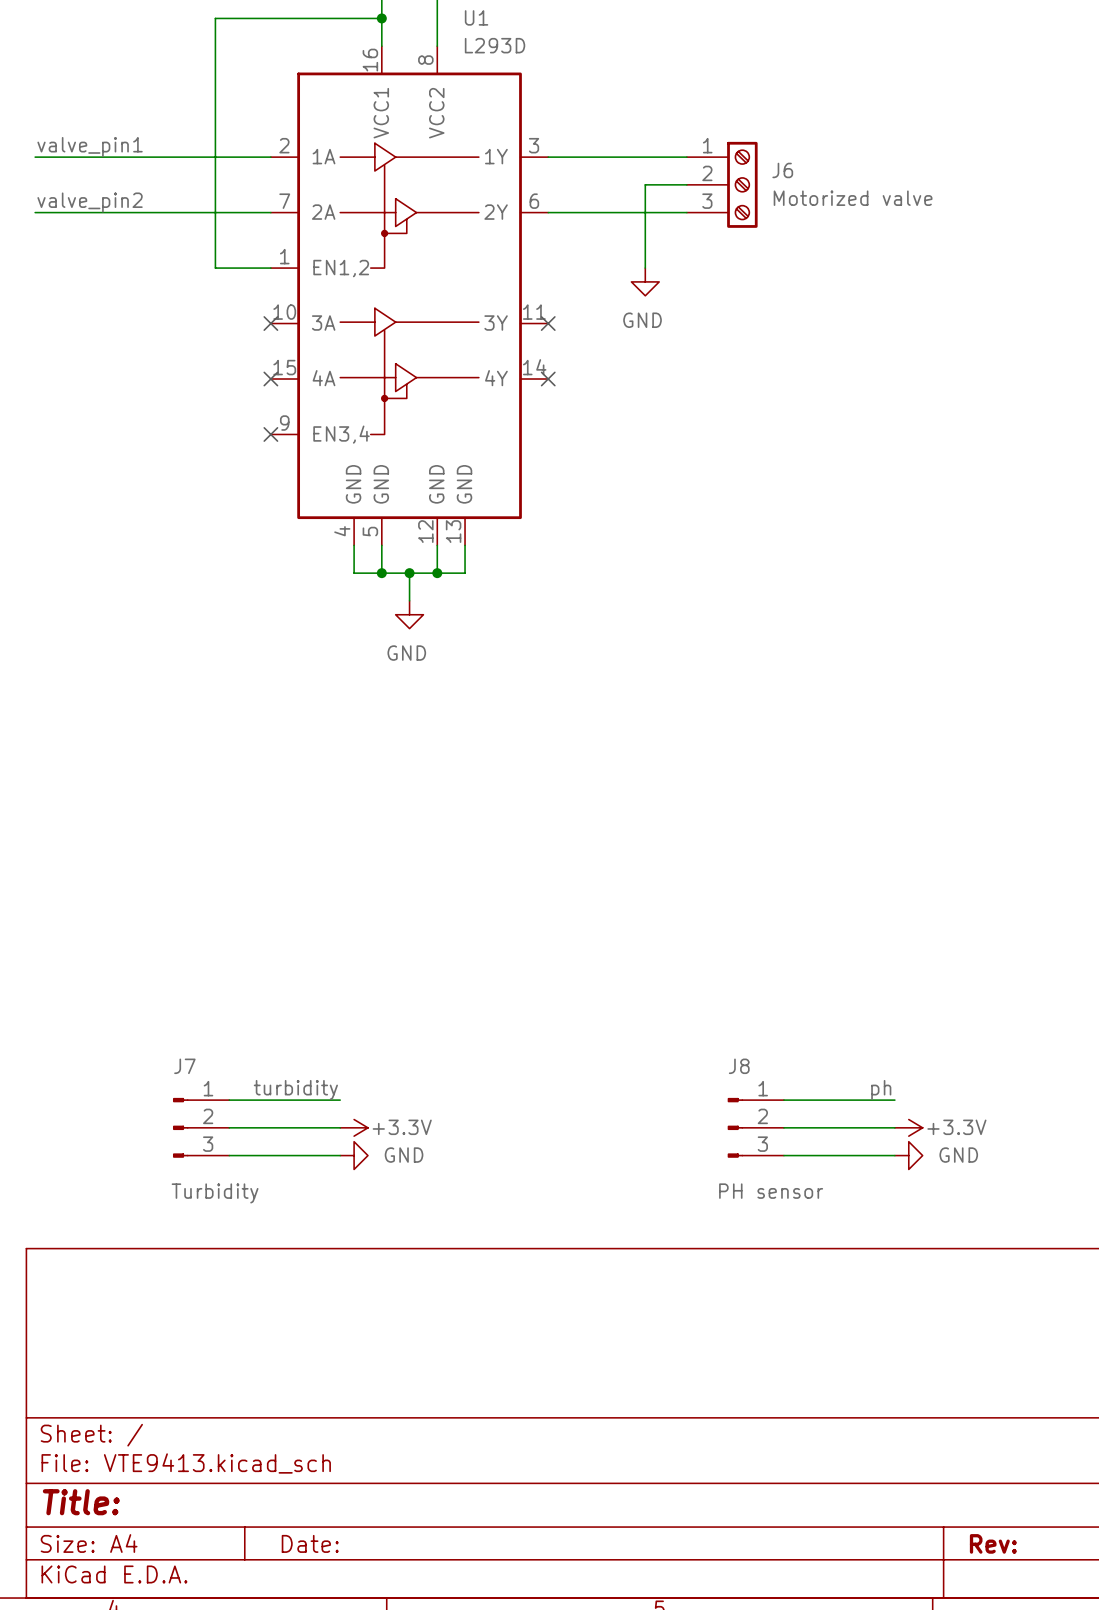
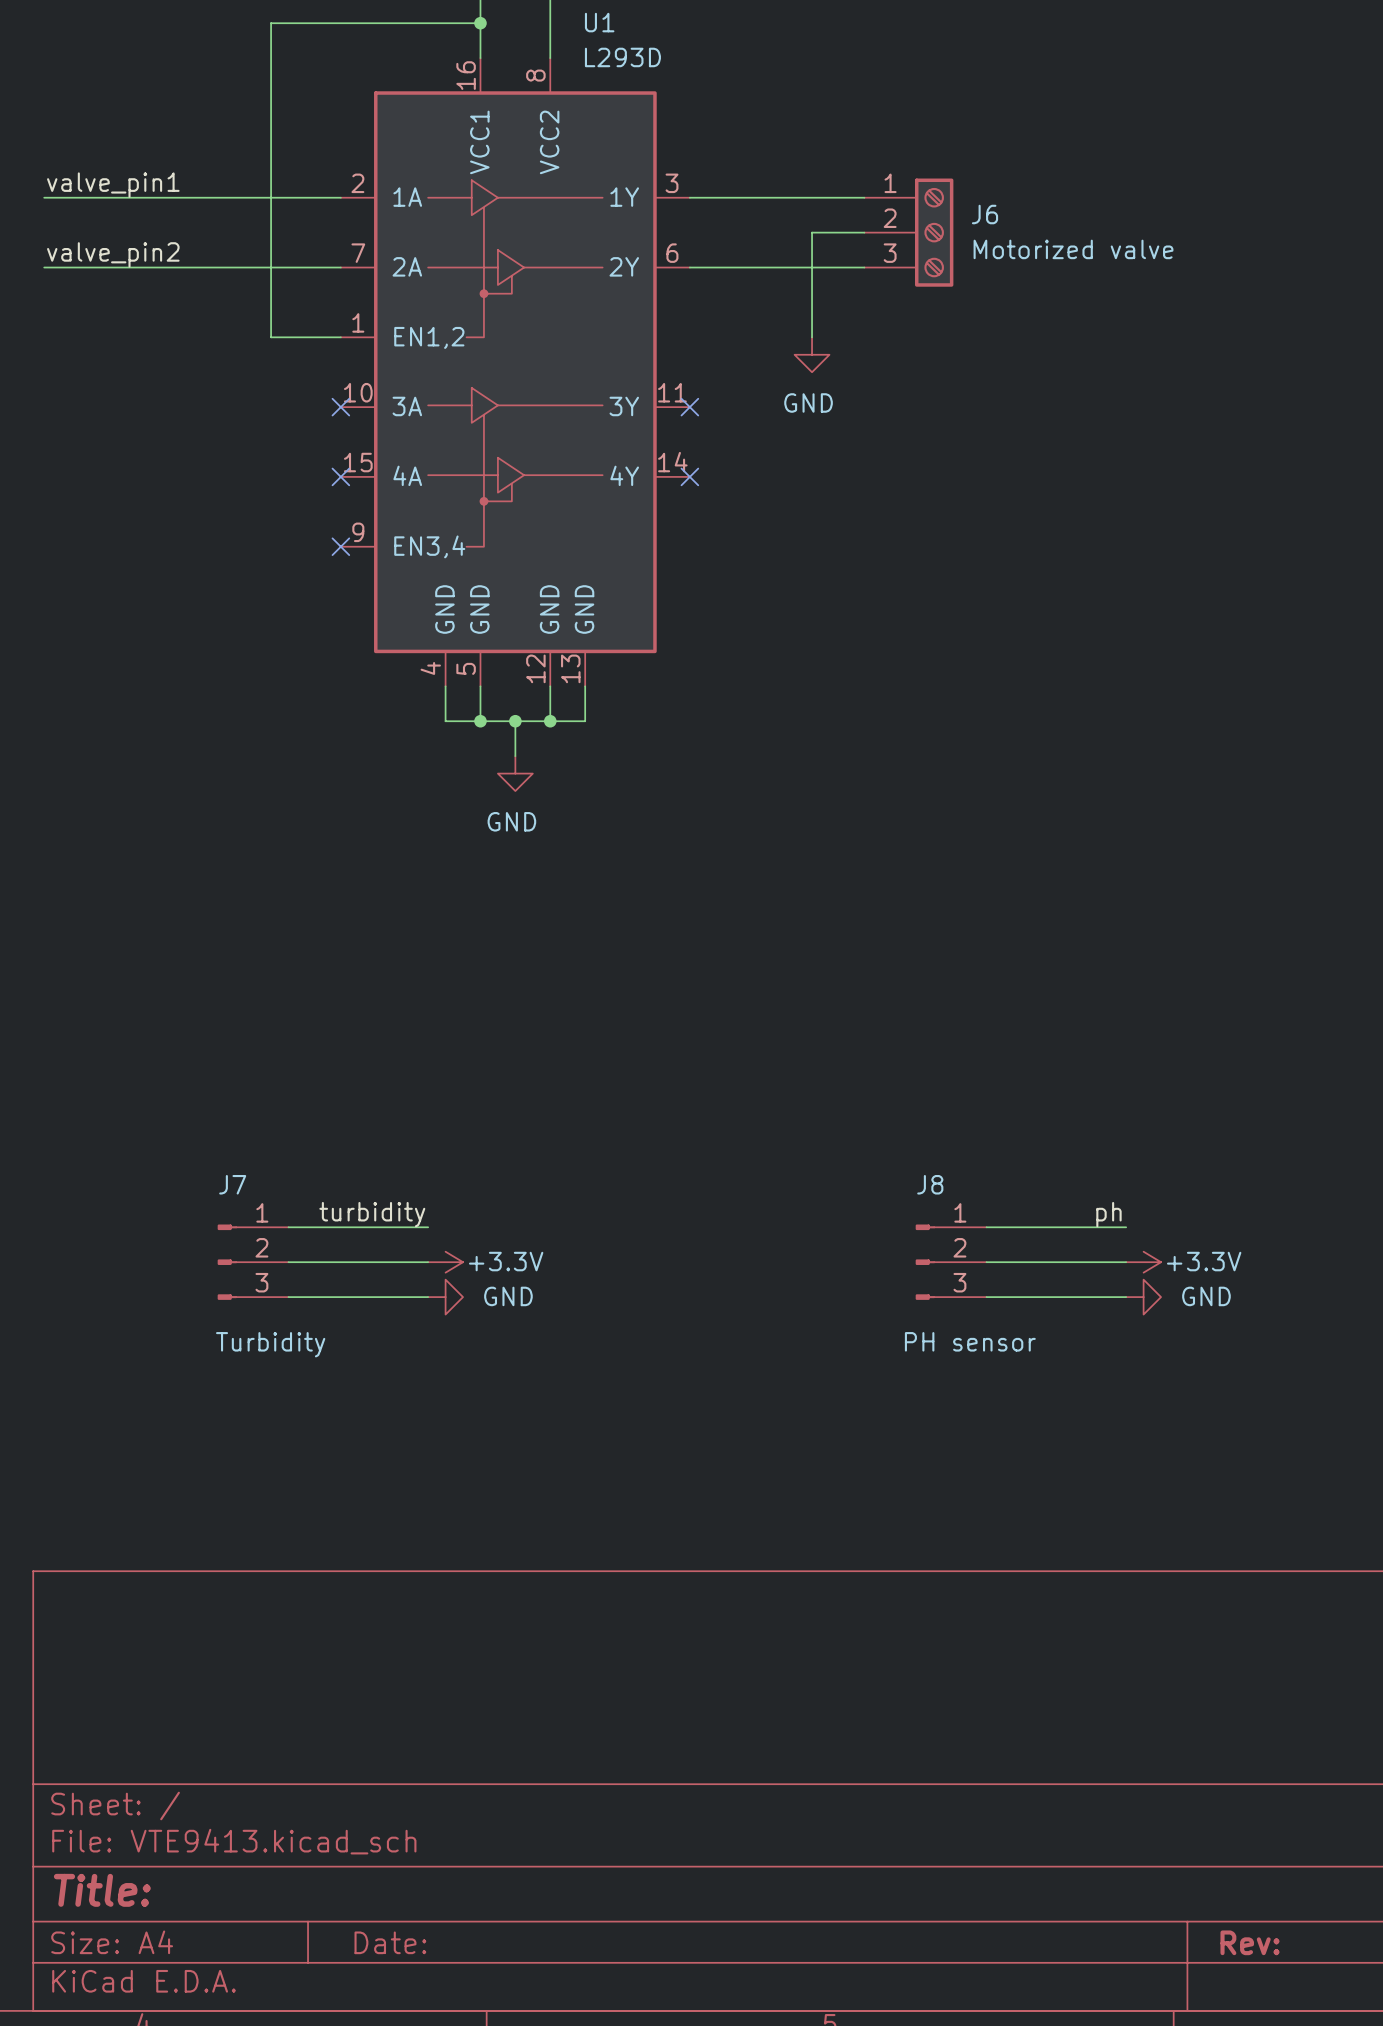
label position: turbidity (295, 1090) -> turbidity (372, 1214)
label position: ph (881, 1090) -> ph (1108, 1214)
wire: (229, 1100) (340, 1100) -> (288, 1227) (428, 1227)
wire: (783, 1100) (894, 1100) -> (986, 1227) (1126, 1227)
J7 position: (201, 1127) -> (253, 1262)
wire: (229, 1127) (340, 1127) -> (288, 1262) (428, 1262)
power symbol position: +3.3V (354, 1127) -> +3.3V (445, 1262)
J8 position: (755, 1127) -> (951, 1262)
wire: (783, 1127) (894, 1127) -> (986, 1262) (1126, 1262)
power symbol position: +3.3V (908, 1127) -> +3.3V (1143, 1262)
wire: (229, 1155) (340, 1155) -> (288, 1297) (428, 1297)
power symbol position: GND (354, 1155) -> GND (445, 1297)
wire: (783, 1155) (894, 1155) -> (986, 1297) (1126, 1297)
power symbol position: GND (908, 1155) -> GND (1143, 1297)

